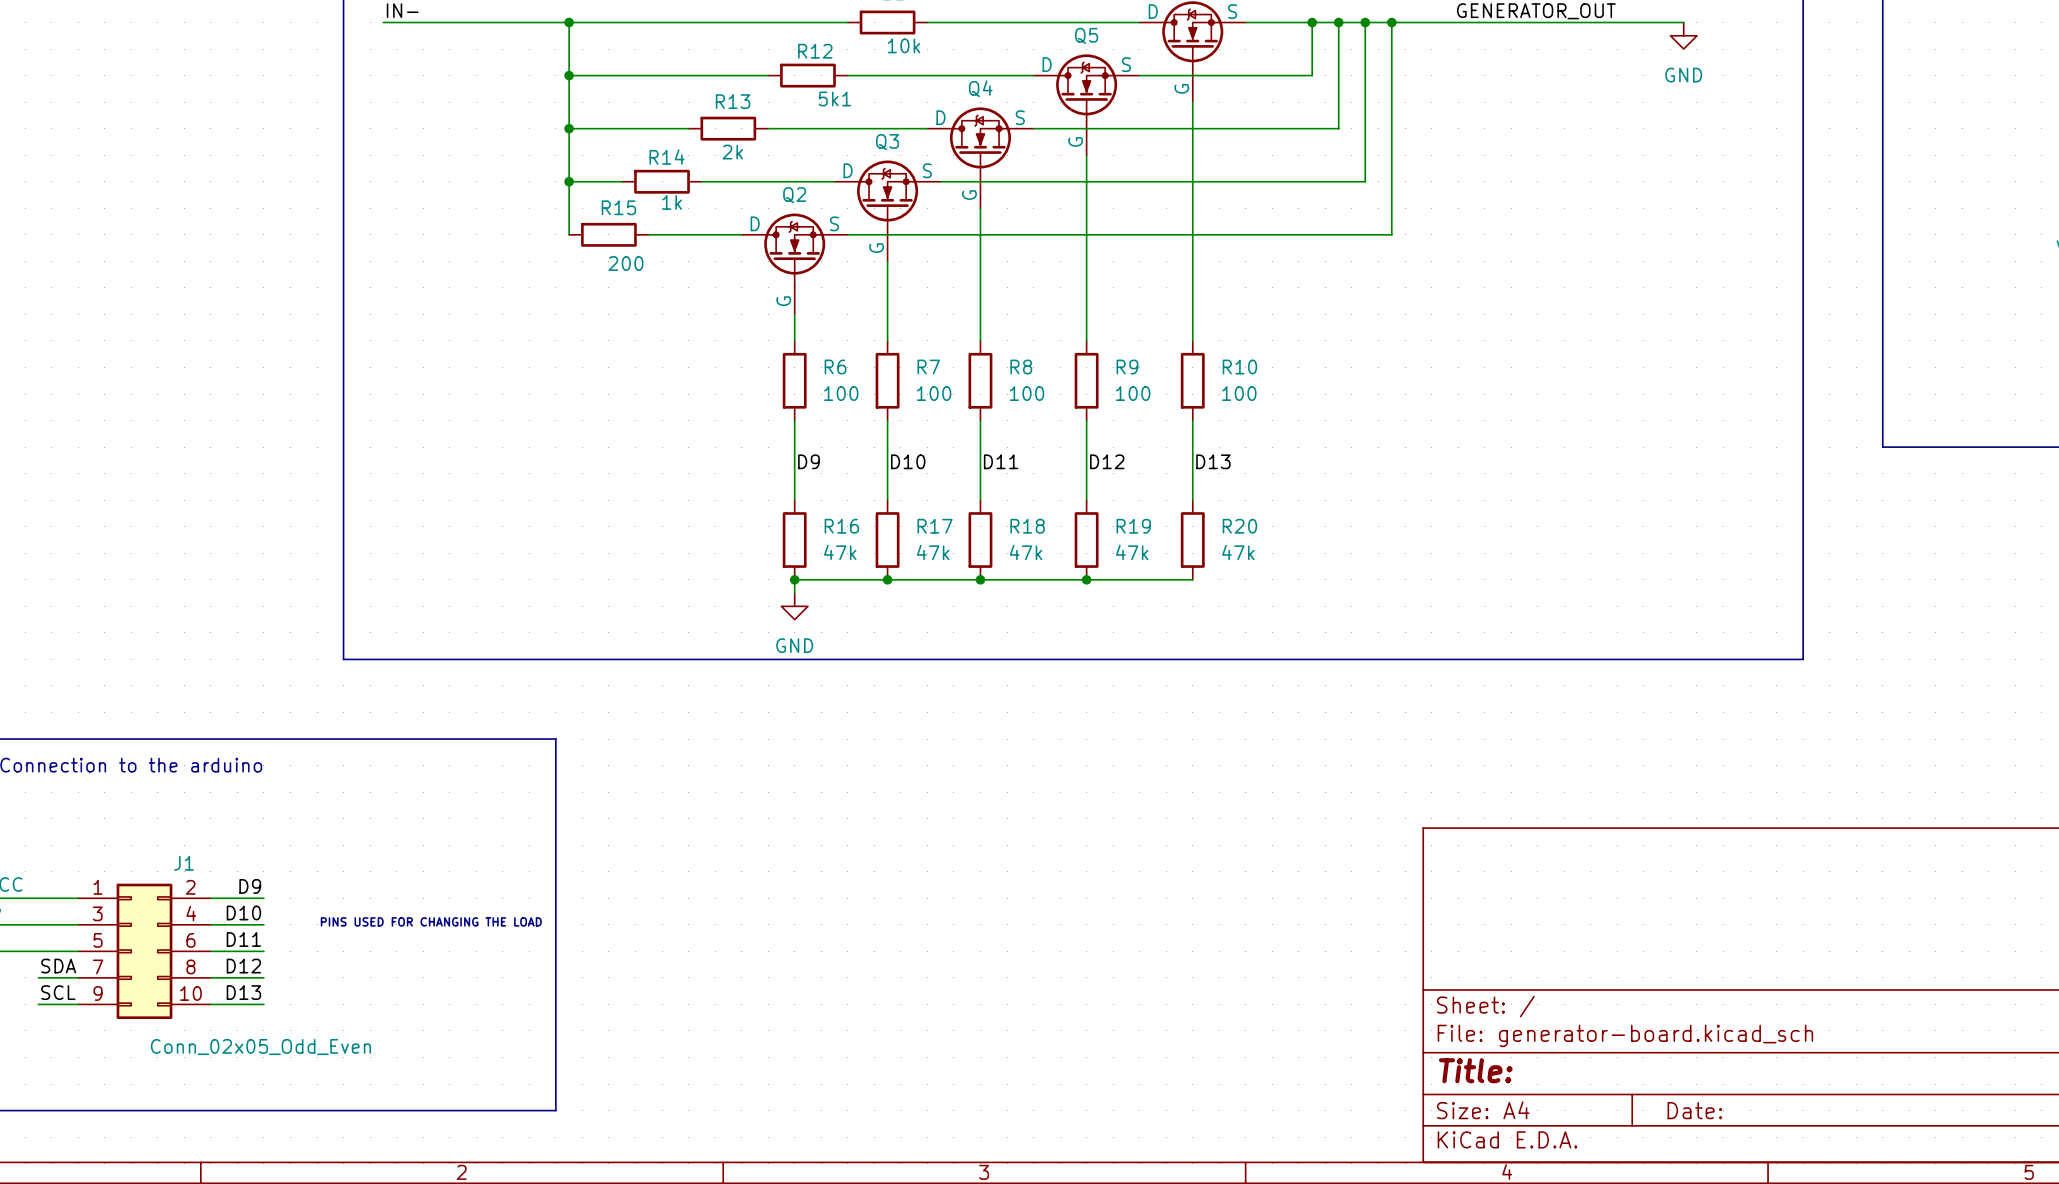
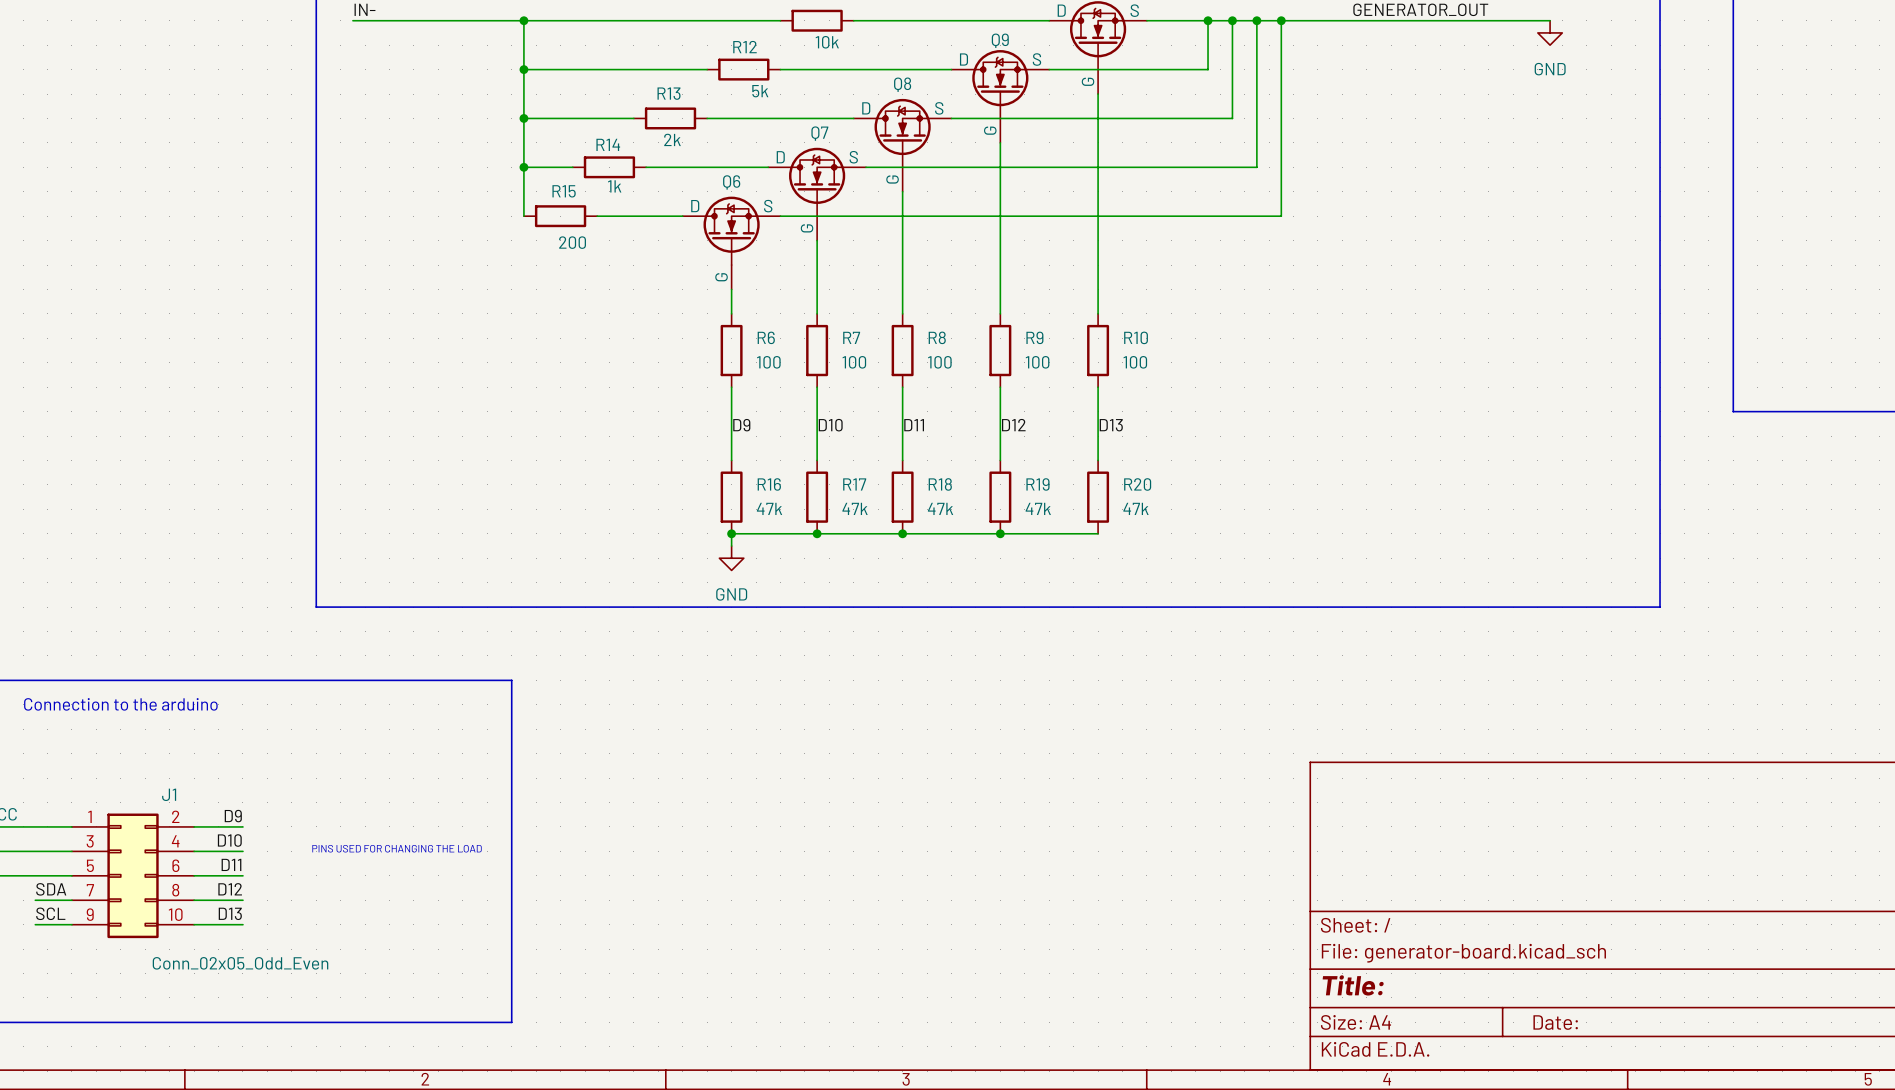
Q5 name: Q5 (1086, 35) -> Q9 (1000, 40)
Q4 name: Q4 (980, 88) -> Q8 (902, 84)
R12 value: 5k1 (834, 98) -> 5k (760, 91)
Q3 name: Q3 (887, 142) -> Q7 (819, 133)
Q2 name: Q2 (794, 195) -> Q6 (731, 182)

